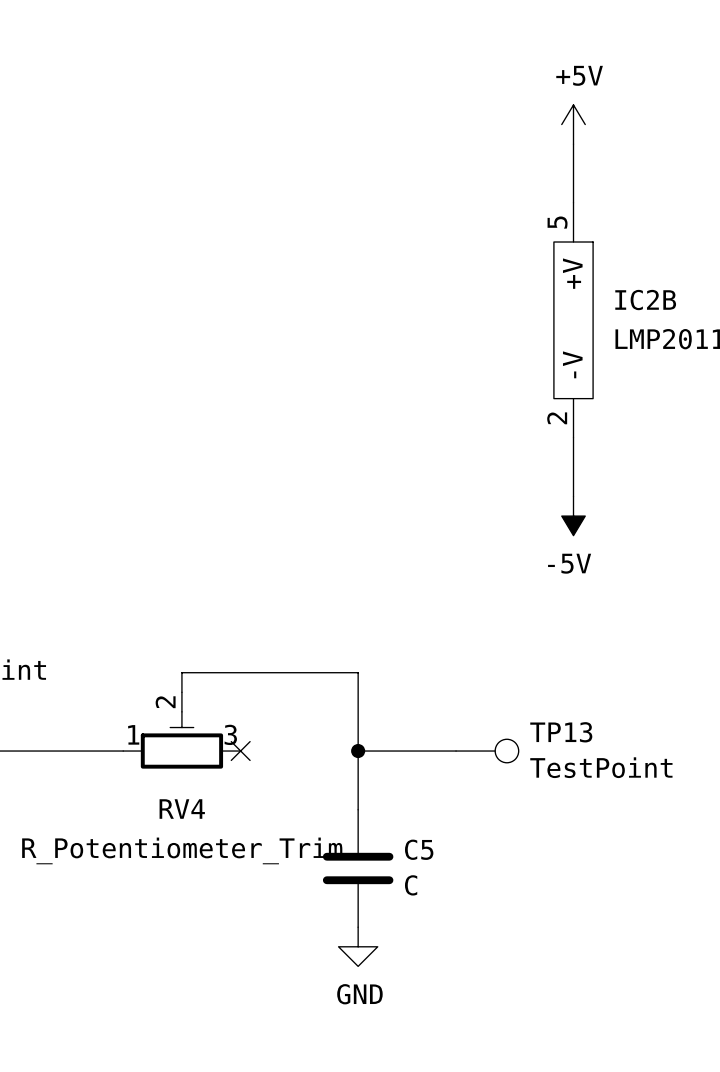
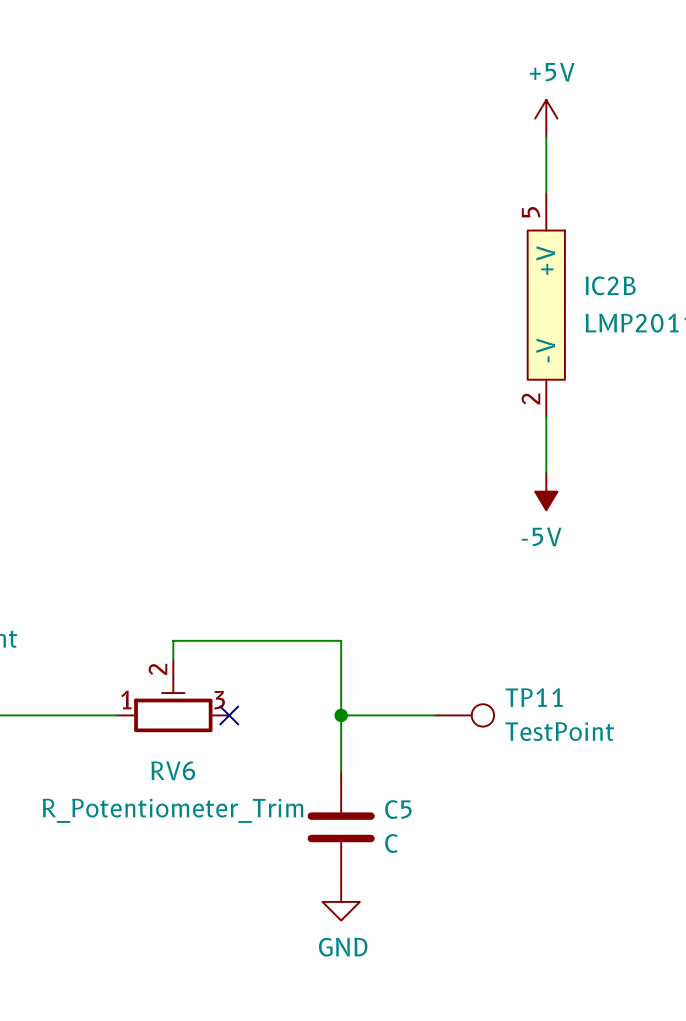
TP13 name: TP13 (561, 732) -> TP11 (534, 697)
RV4 name: RV4 (182, 809) -> RV6 (173, 770)

